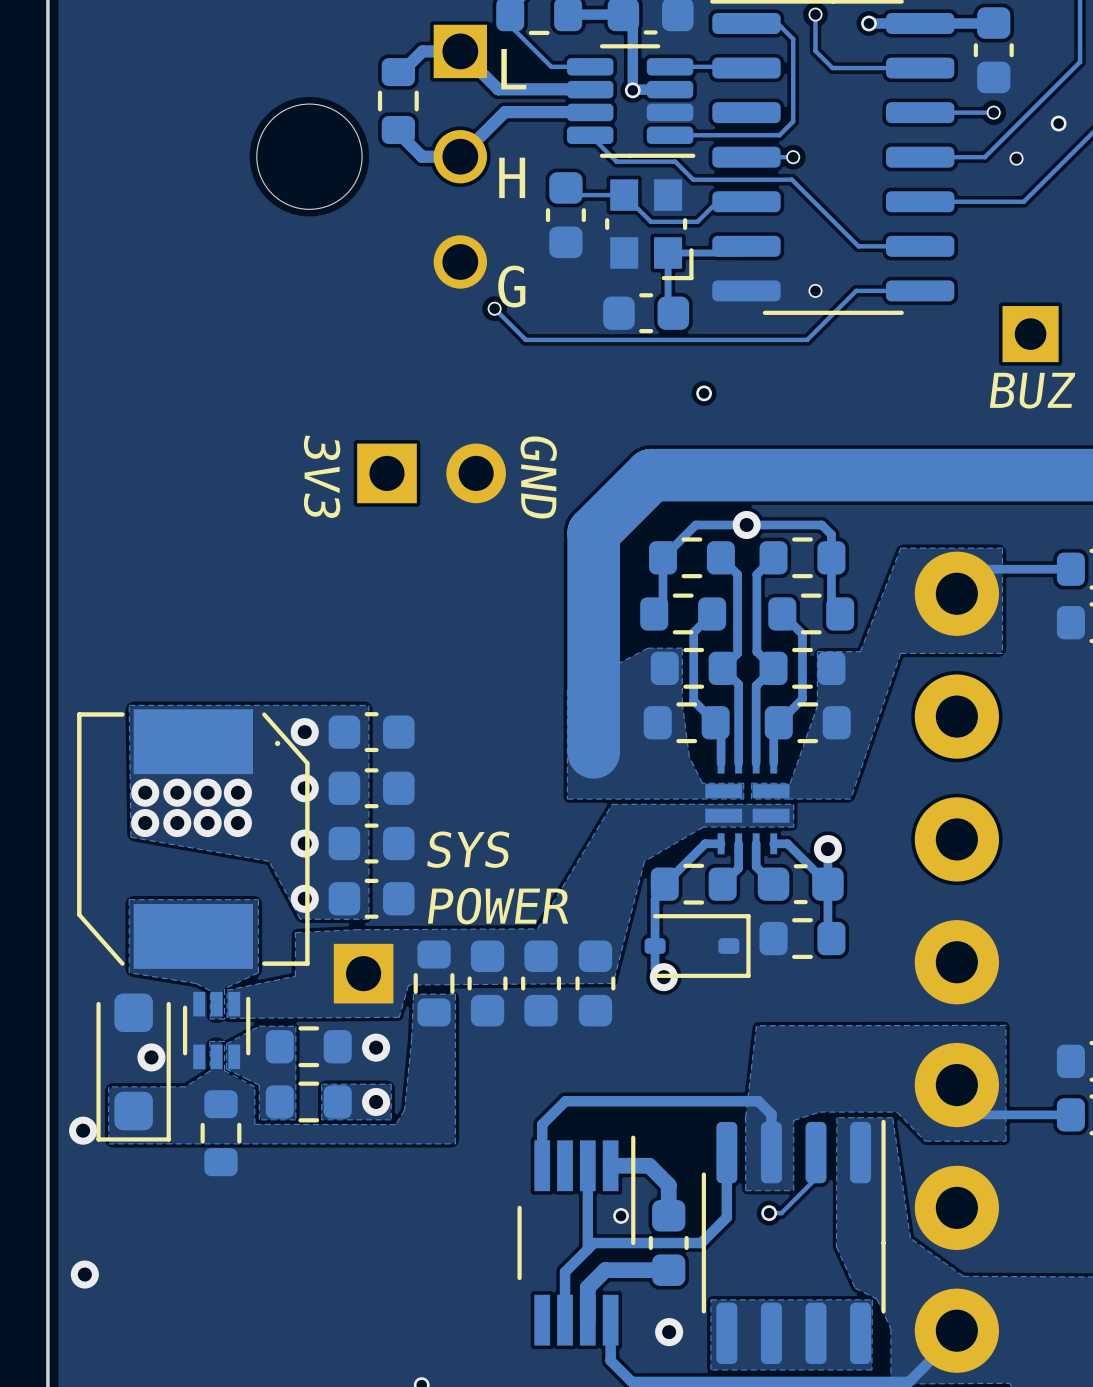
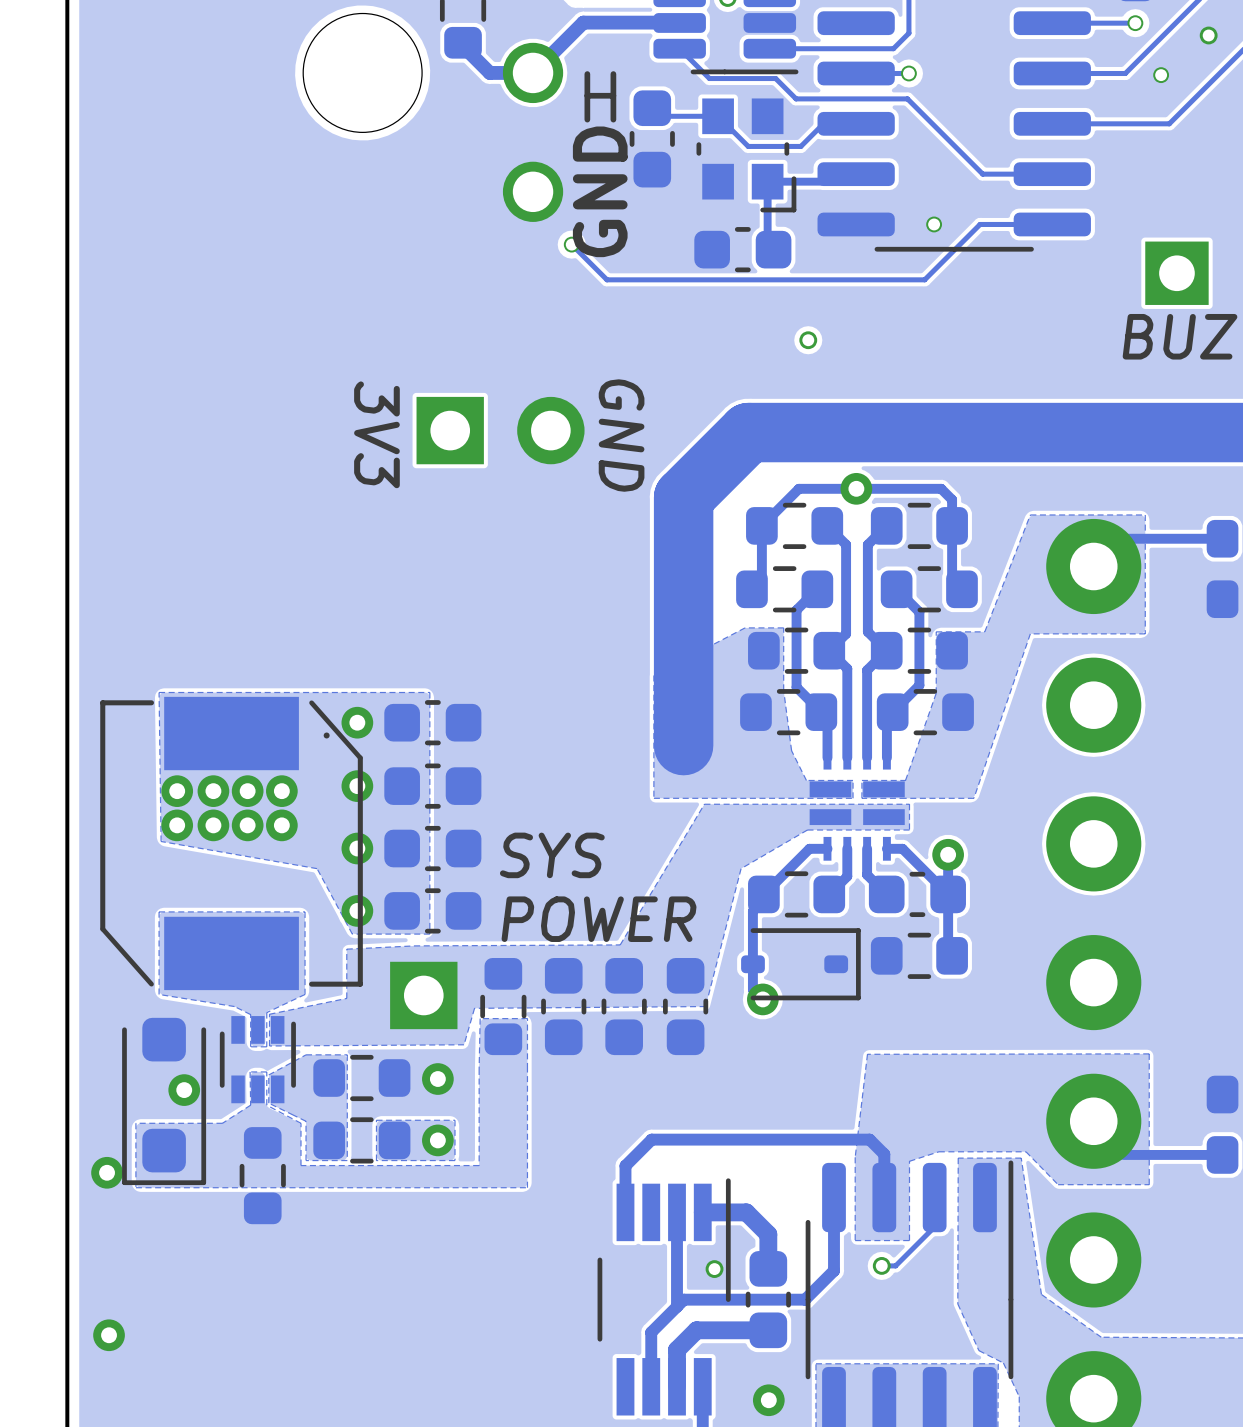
text: none -> GND (600, 191)
text: G (511, 286) -> none
zone outline: (413, 994) (411, 1038) (404, 1110) (395, 1124) (254, 1124) -> (480, 1018) (479, 1165) (300, 1165)

